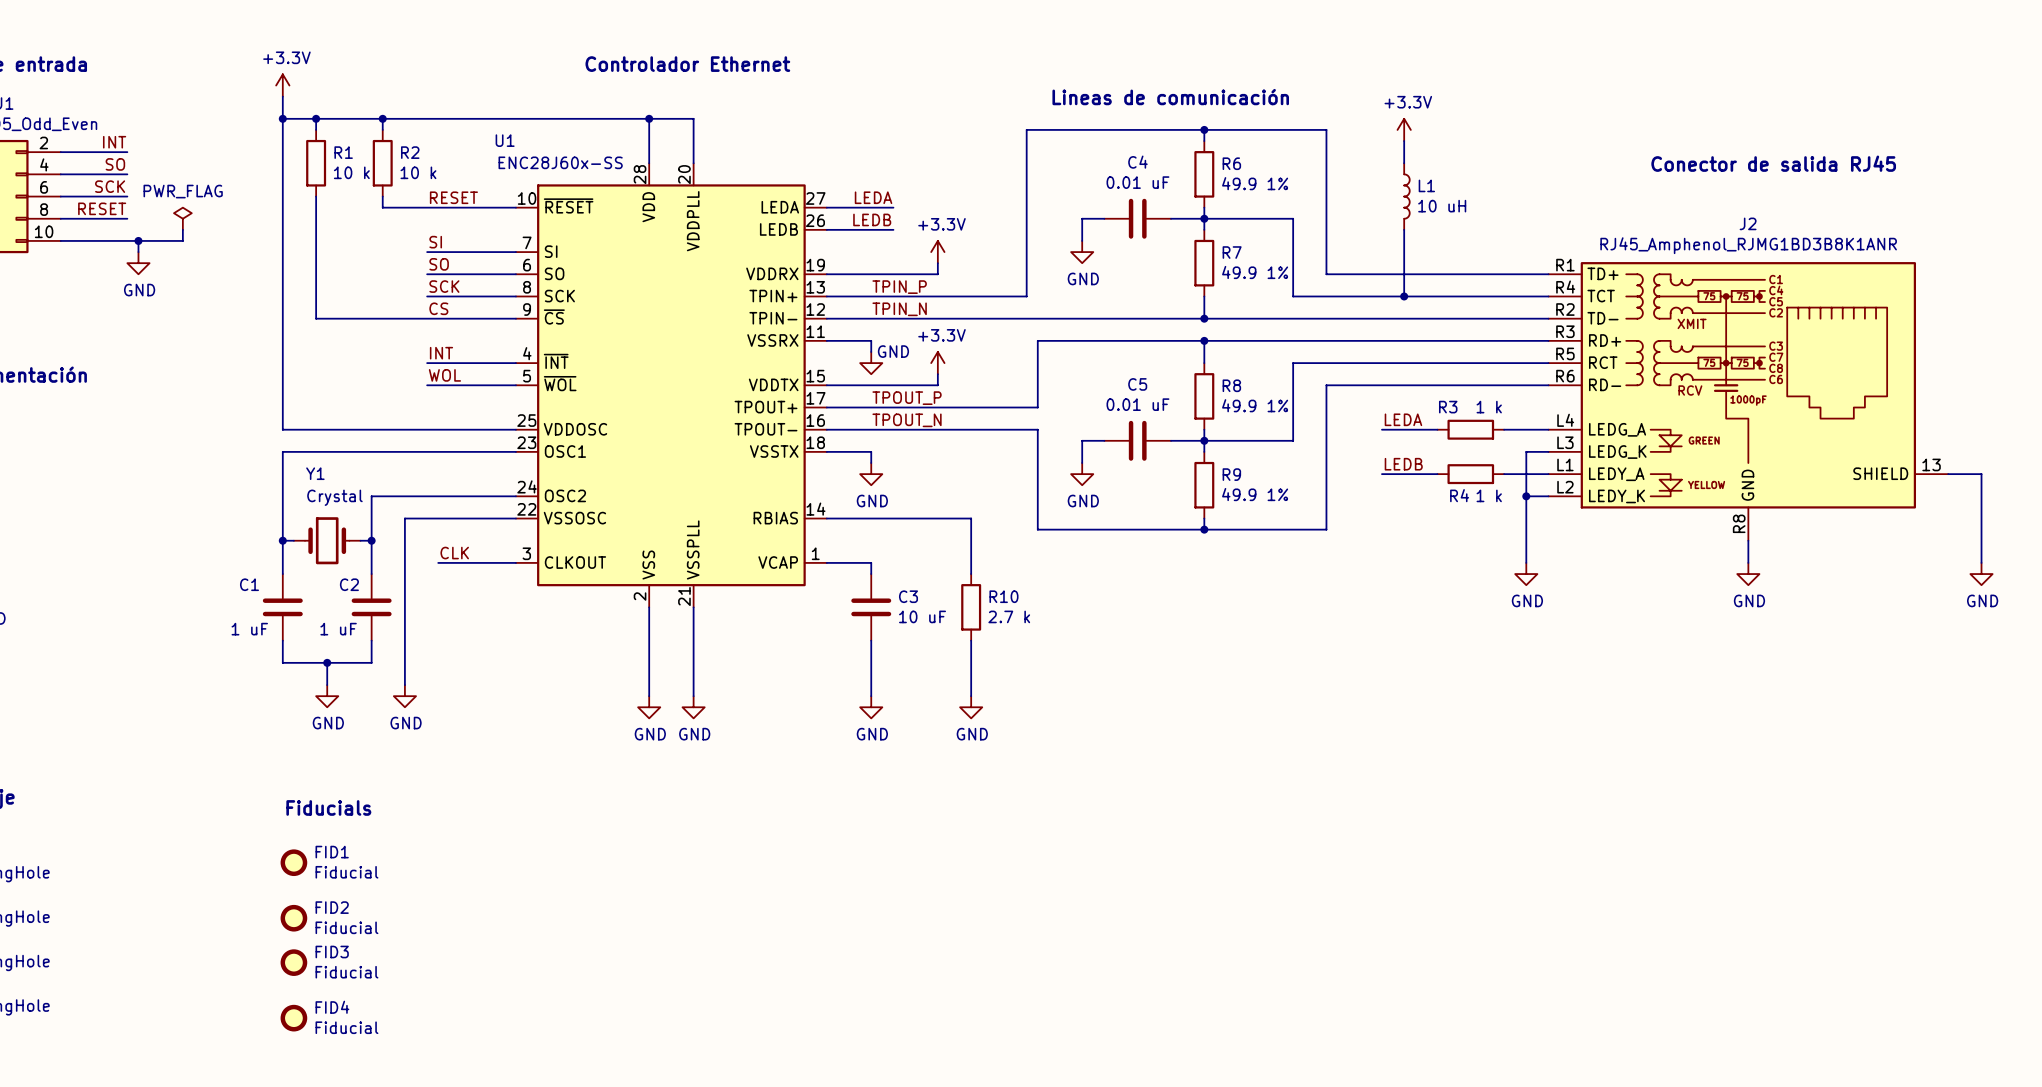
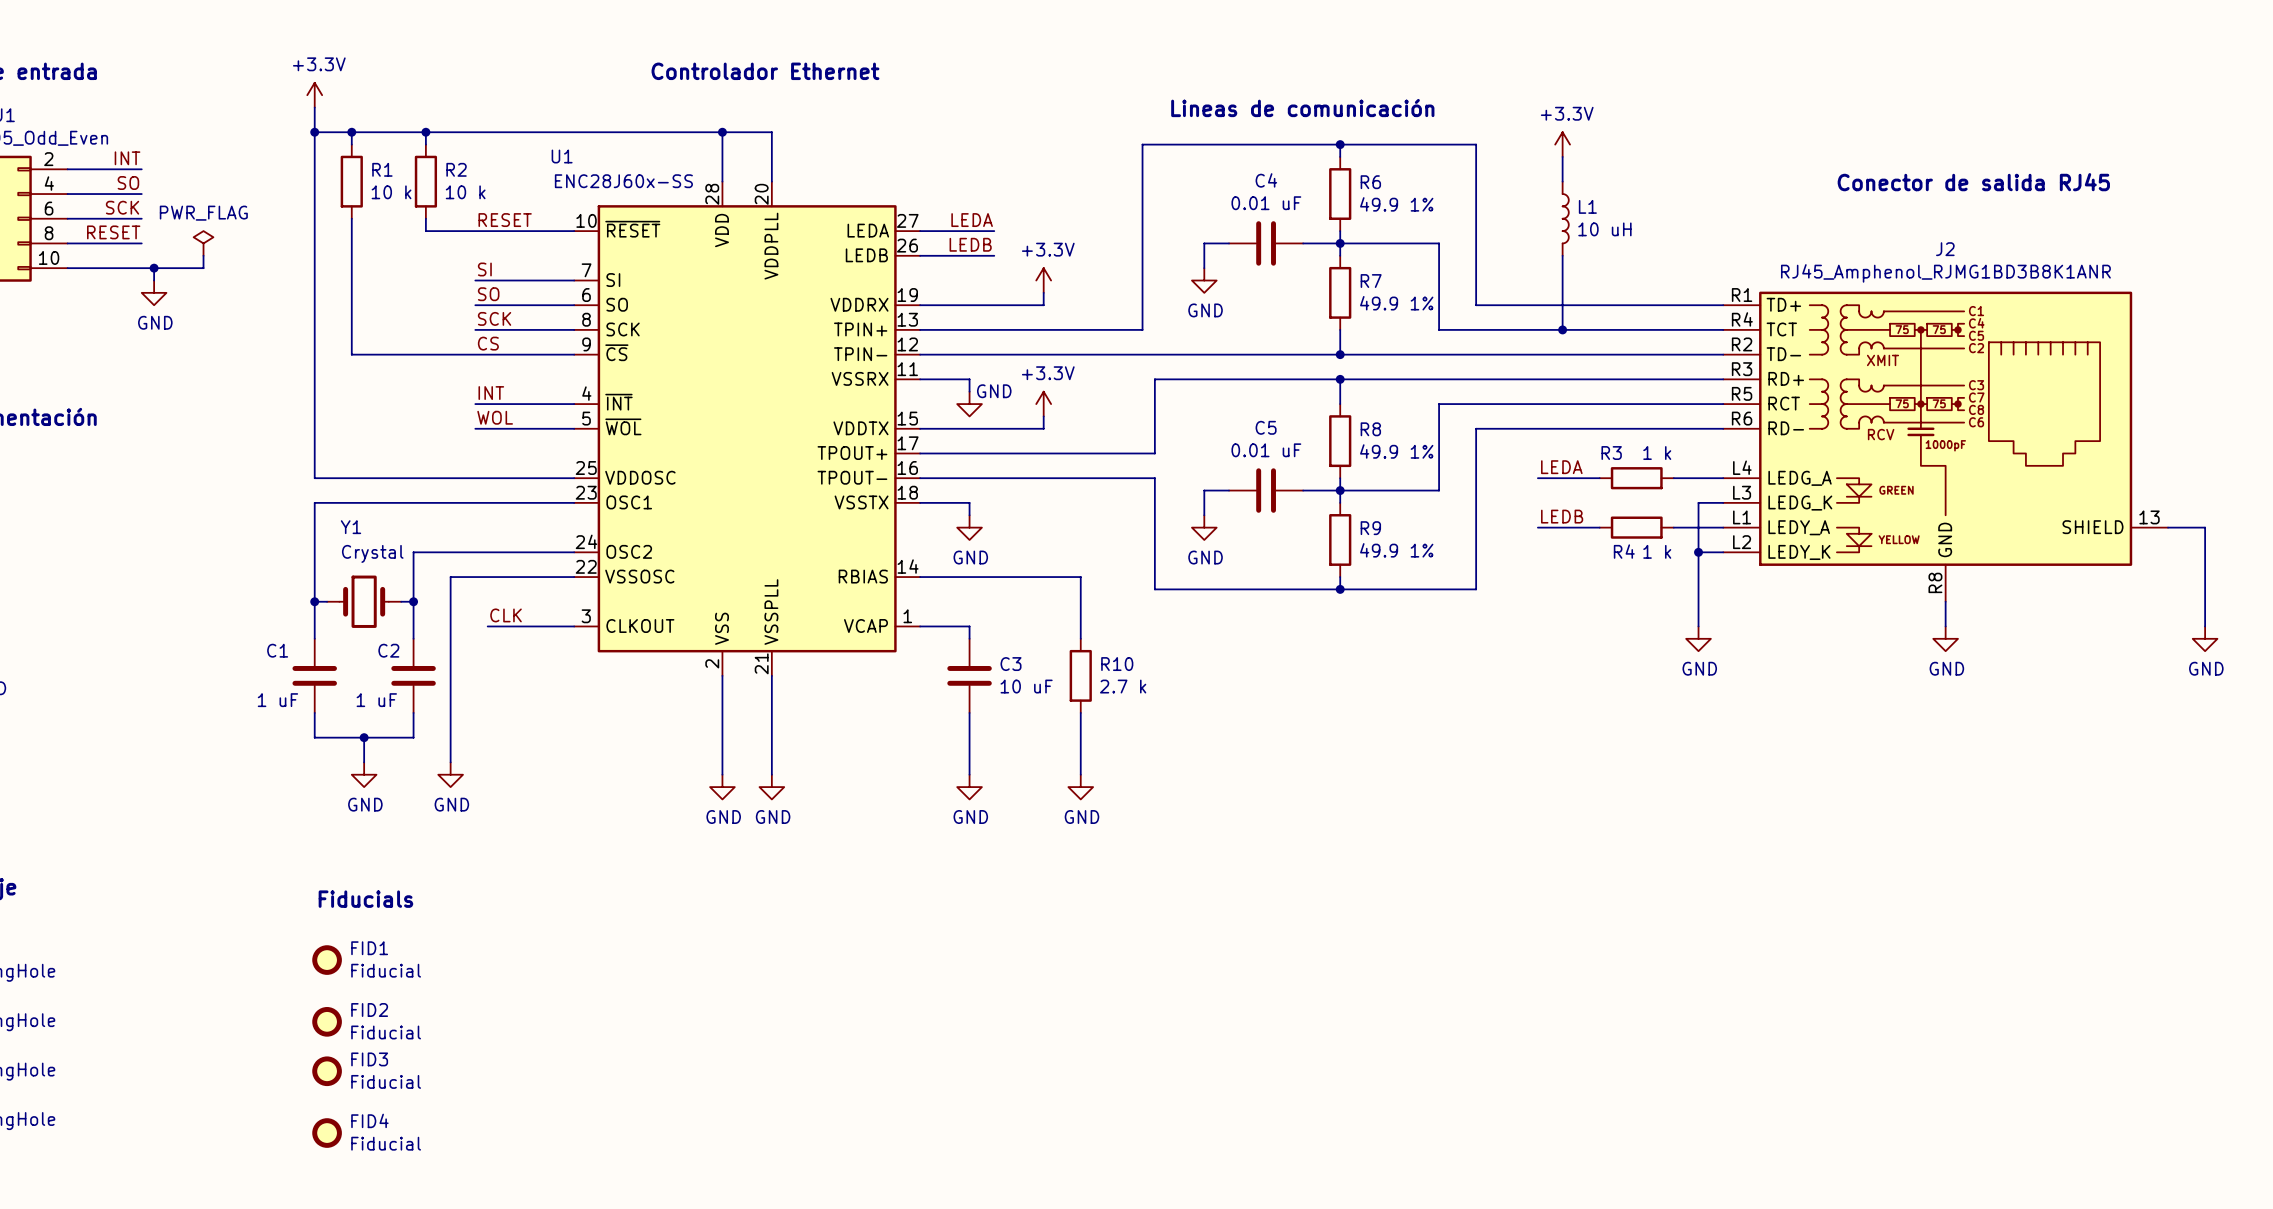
label: TPIN_P (899, 287) -> none
label: TPIN_N (899, 309) -> none
label: TPOUT_P (907, 398) -> none
label: TPOUT_N (907, 420) -> none

